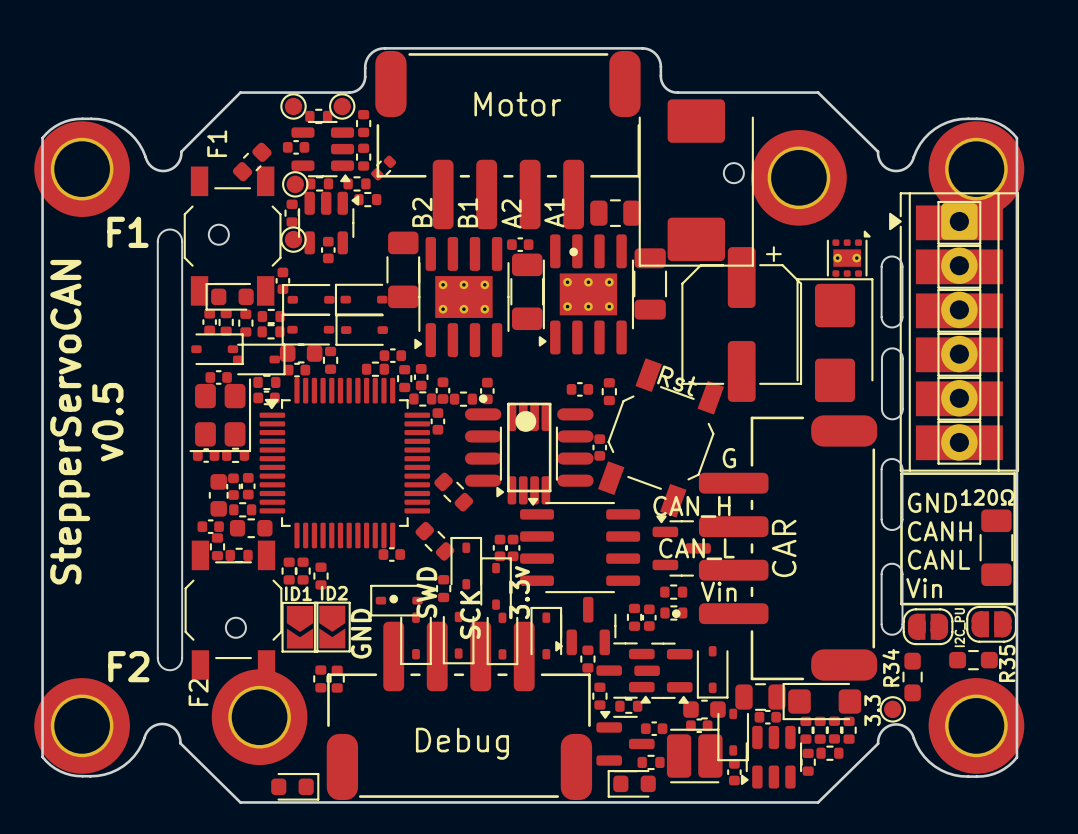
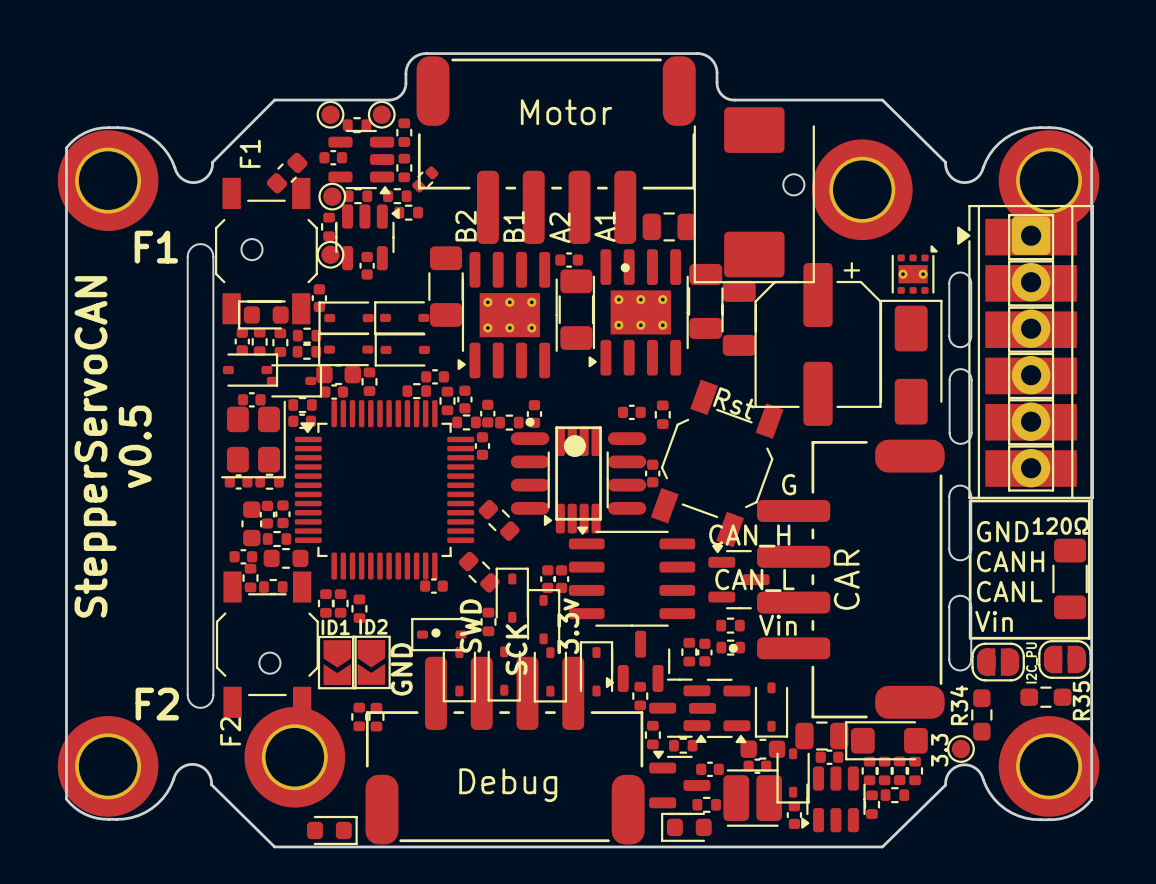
part footprint: [796, 278, 874, 403] -> [879, 299, 943, 425]
part: none -> (739, 318)
part position: (741, 324) -> (818, 344)

